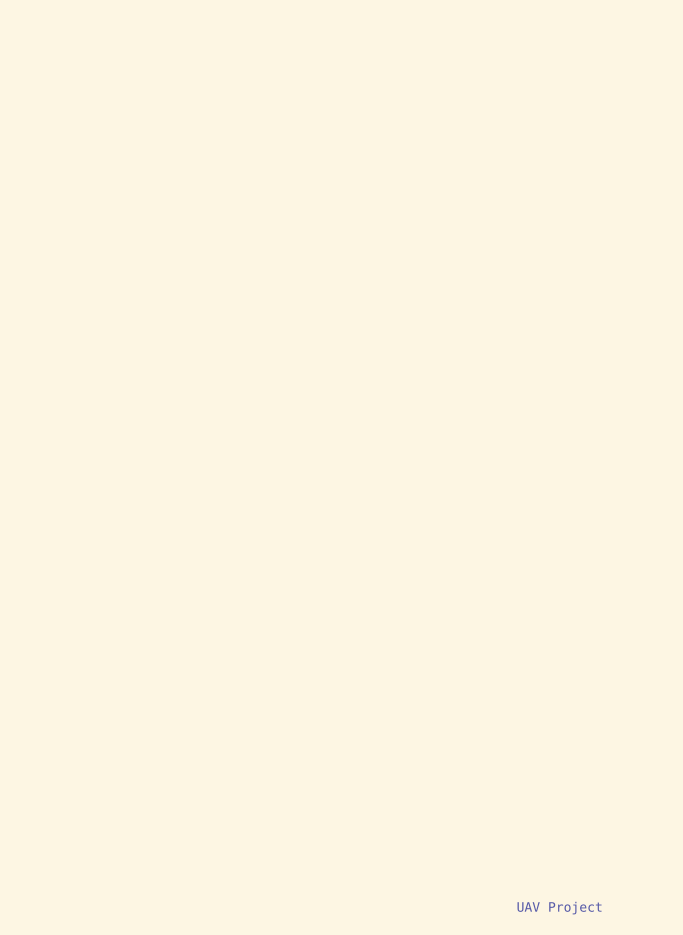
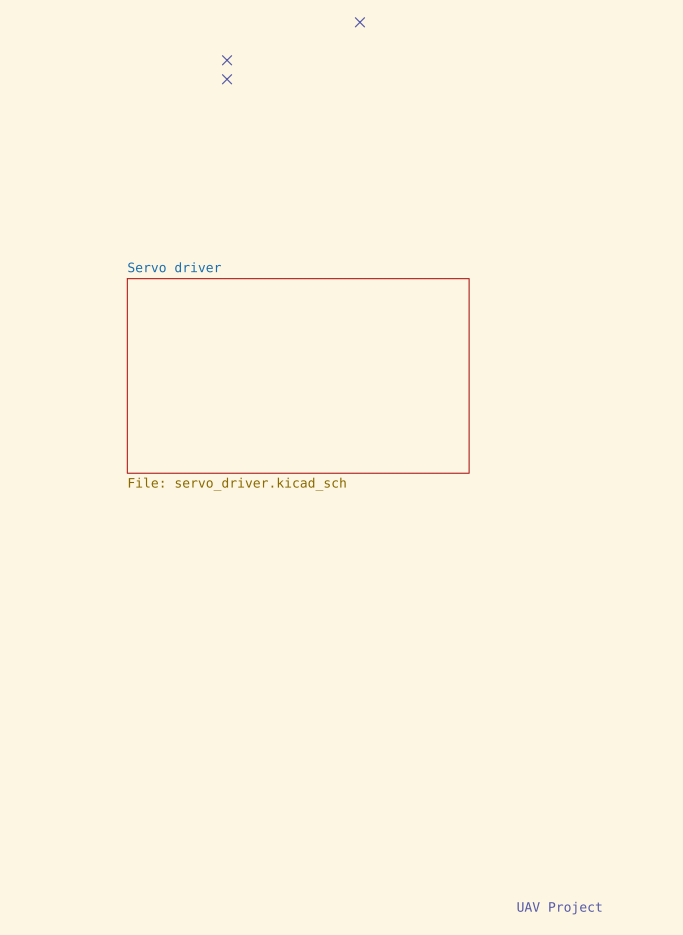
no-connect mark: none -> (359, 22)
no-connect mark: none -> (227, 60)
no-connect mark: none -> (227, 79)
sheet Servo driver: none -> File: servo_driver.kicad_sch (298, 375)

